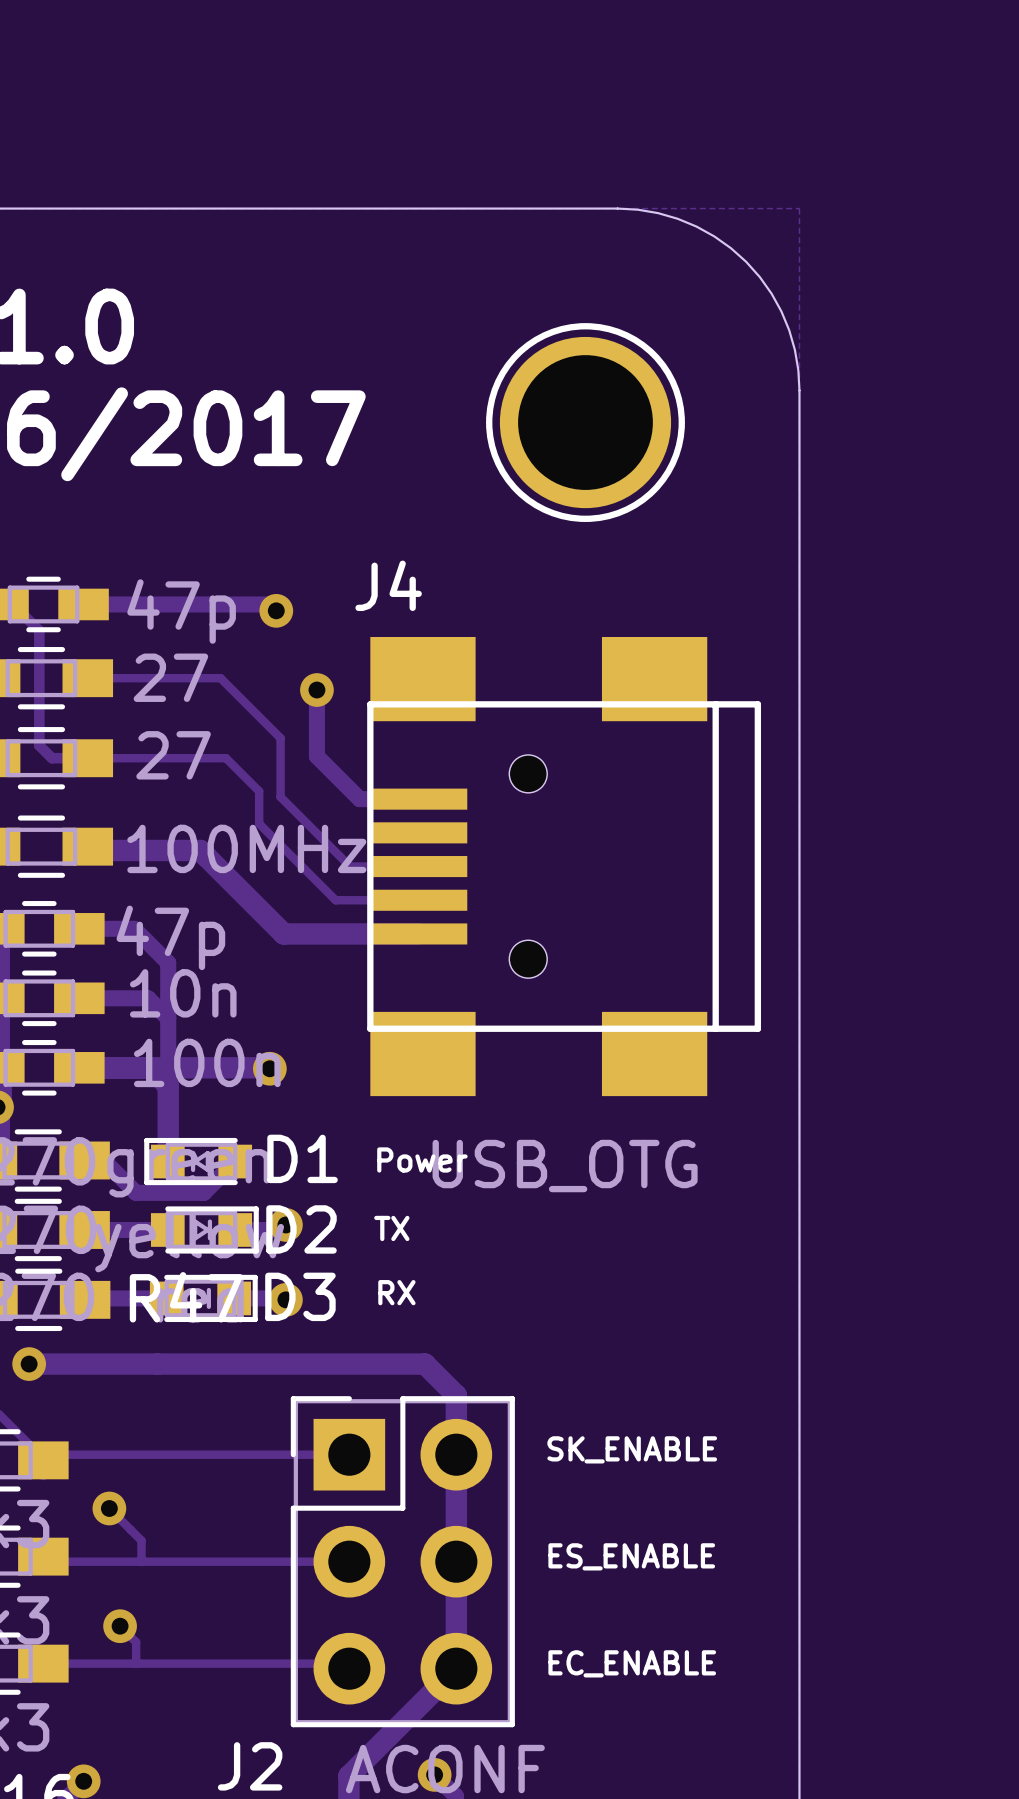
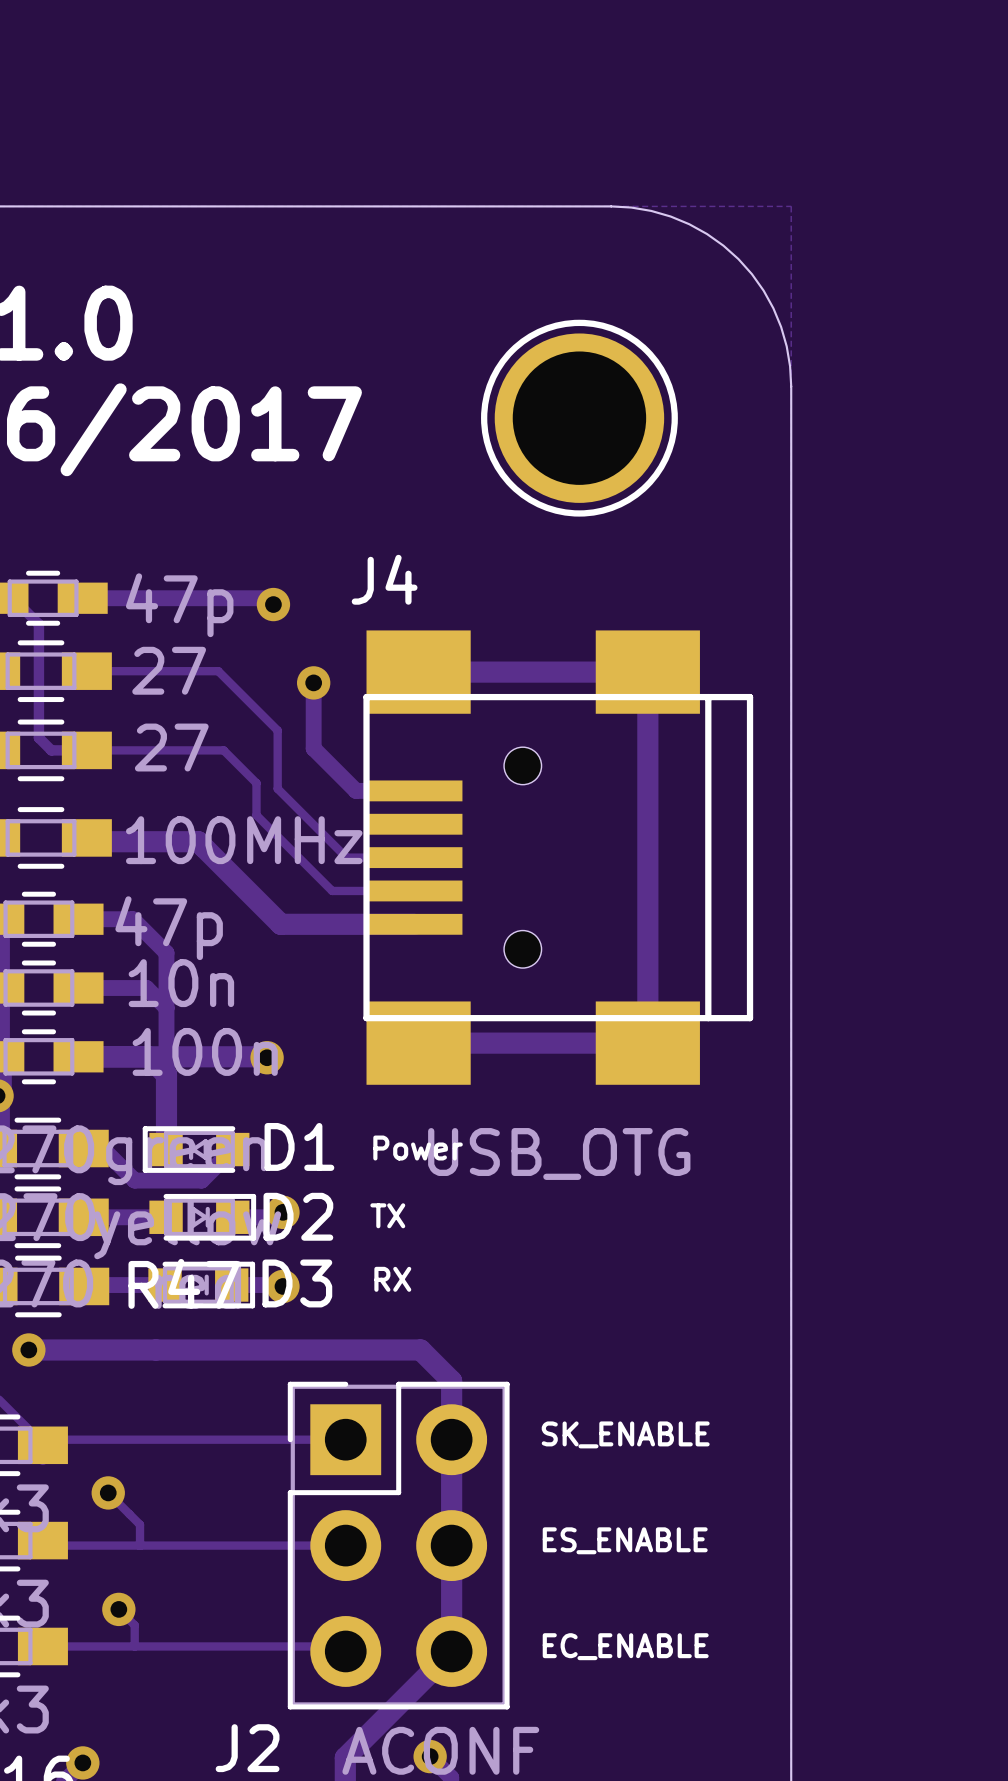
track: none -> (418, 672) (647, 672) (647, 1043) (418, 1043)

